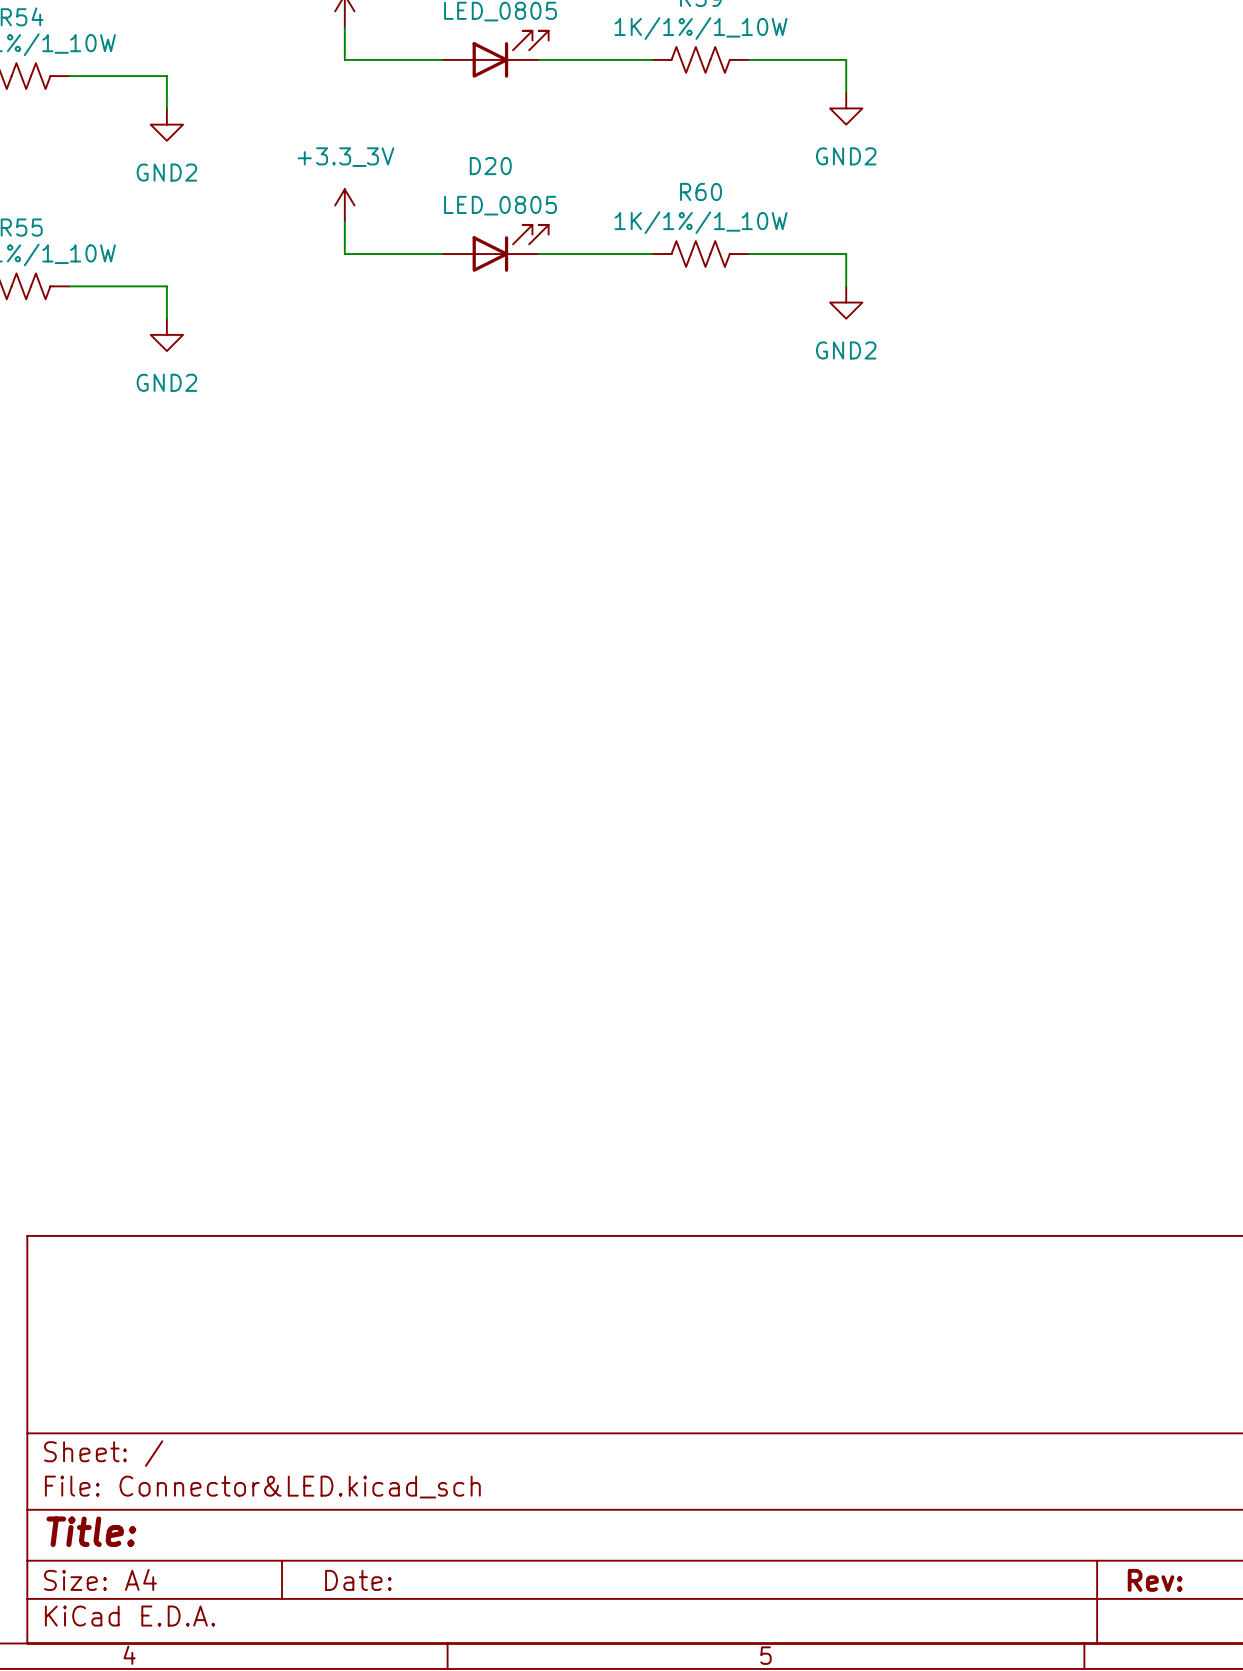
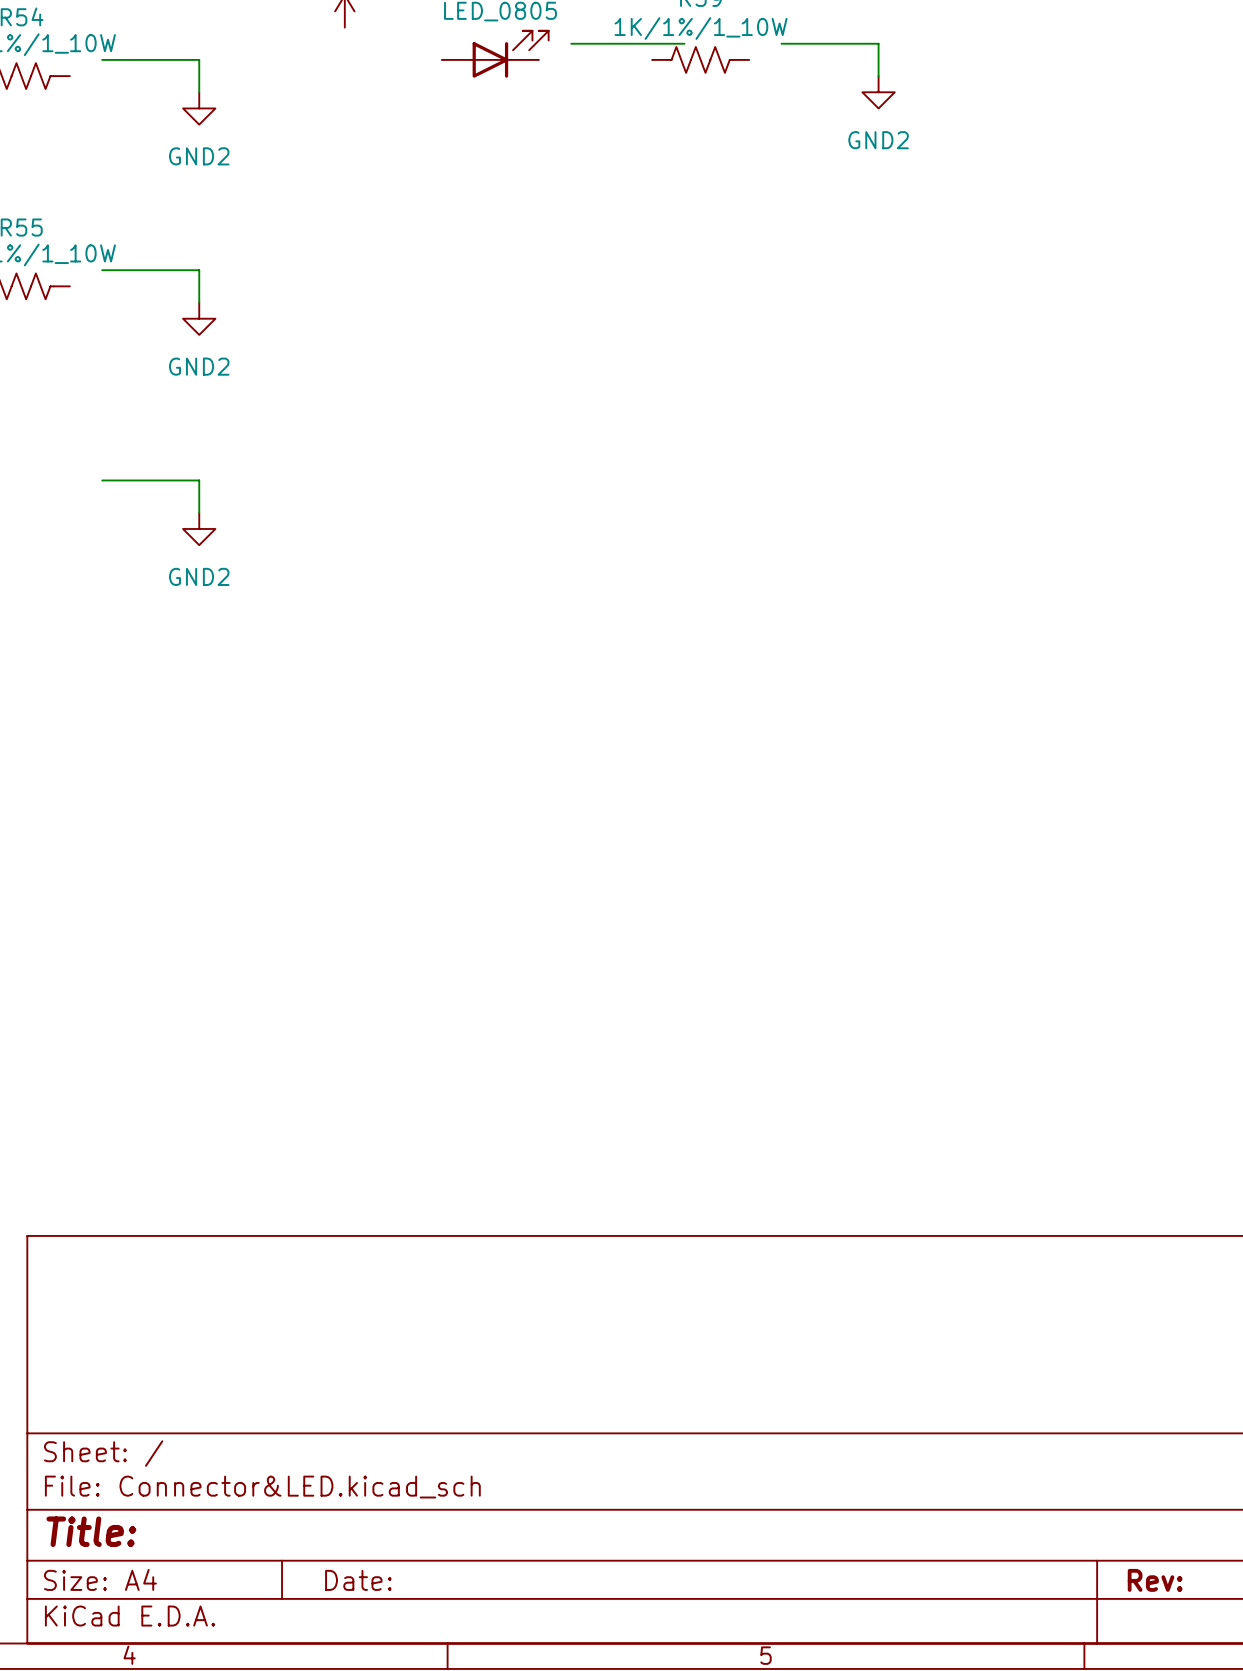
wire: (344, 27) (344, 59) (441, 59) -> none
wire: (538, 59) (652, 59) -> (571, 43) (684, 43)
wire: (749, 59) (846, 59) (846, 92) -> (781, 43) (878, 43) (878, 76)
wire: (69, 76) (166, 76) (166, 108) -> (102, 59) (199, 59) (199, 92)
power symbol position: GND2 (846, 108) -> GND2 (878, 92)
power symbol position: GND2 (166, 124) -> GND2 (199, 108)
power symbol: +3.3_3V (344, 205) -> none
wire: (344, 221) (344, 254) (441, 254) -> none
D20: LED_0805 (495, 248) -> none
wire: (538, 254) (652, 254) -> none
R60: 1K/1%/1_10W (700, 254) -> none
wire: (749, 254) (846, 254) (846, 286) -> none
wire: (69, 286) (166, 286) (166, 318) -> (102, 270) (199, 270) (199, 302)
power symbol: GND2 (846, 302) -> none
power symbol position: GND2 (166, 334) -> GND2 (199, 318)
wire: none -> (102, 480) (199, 480) (199, 512)
power symbol: none -> GND2 (199, 528)

